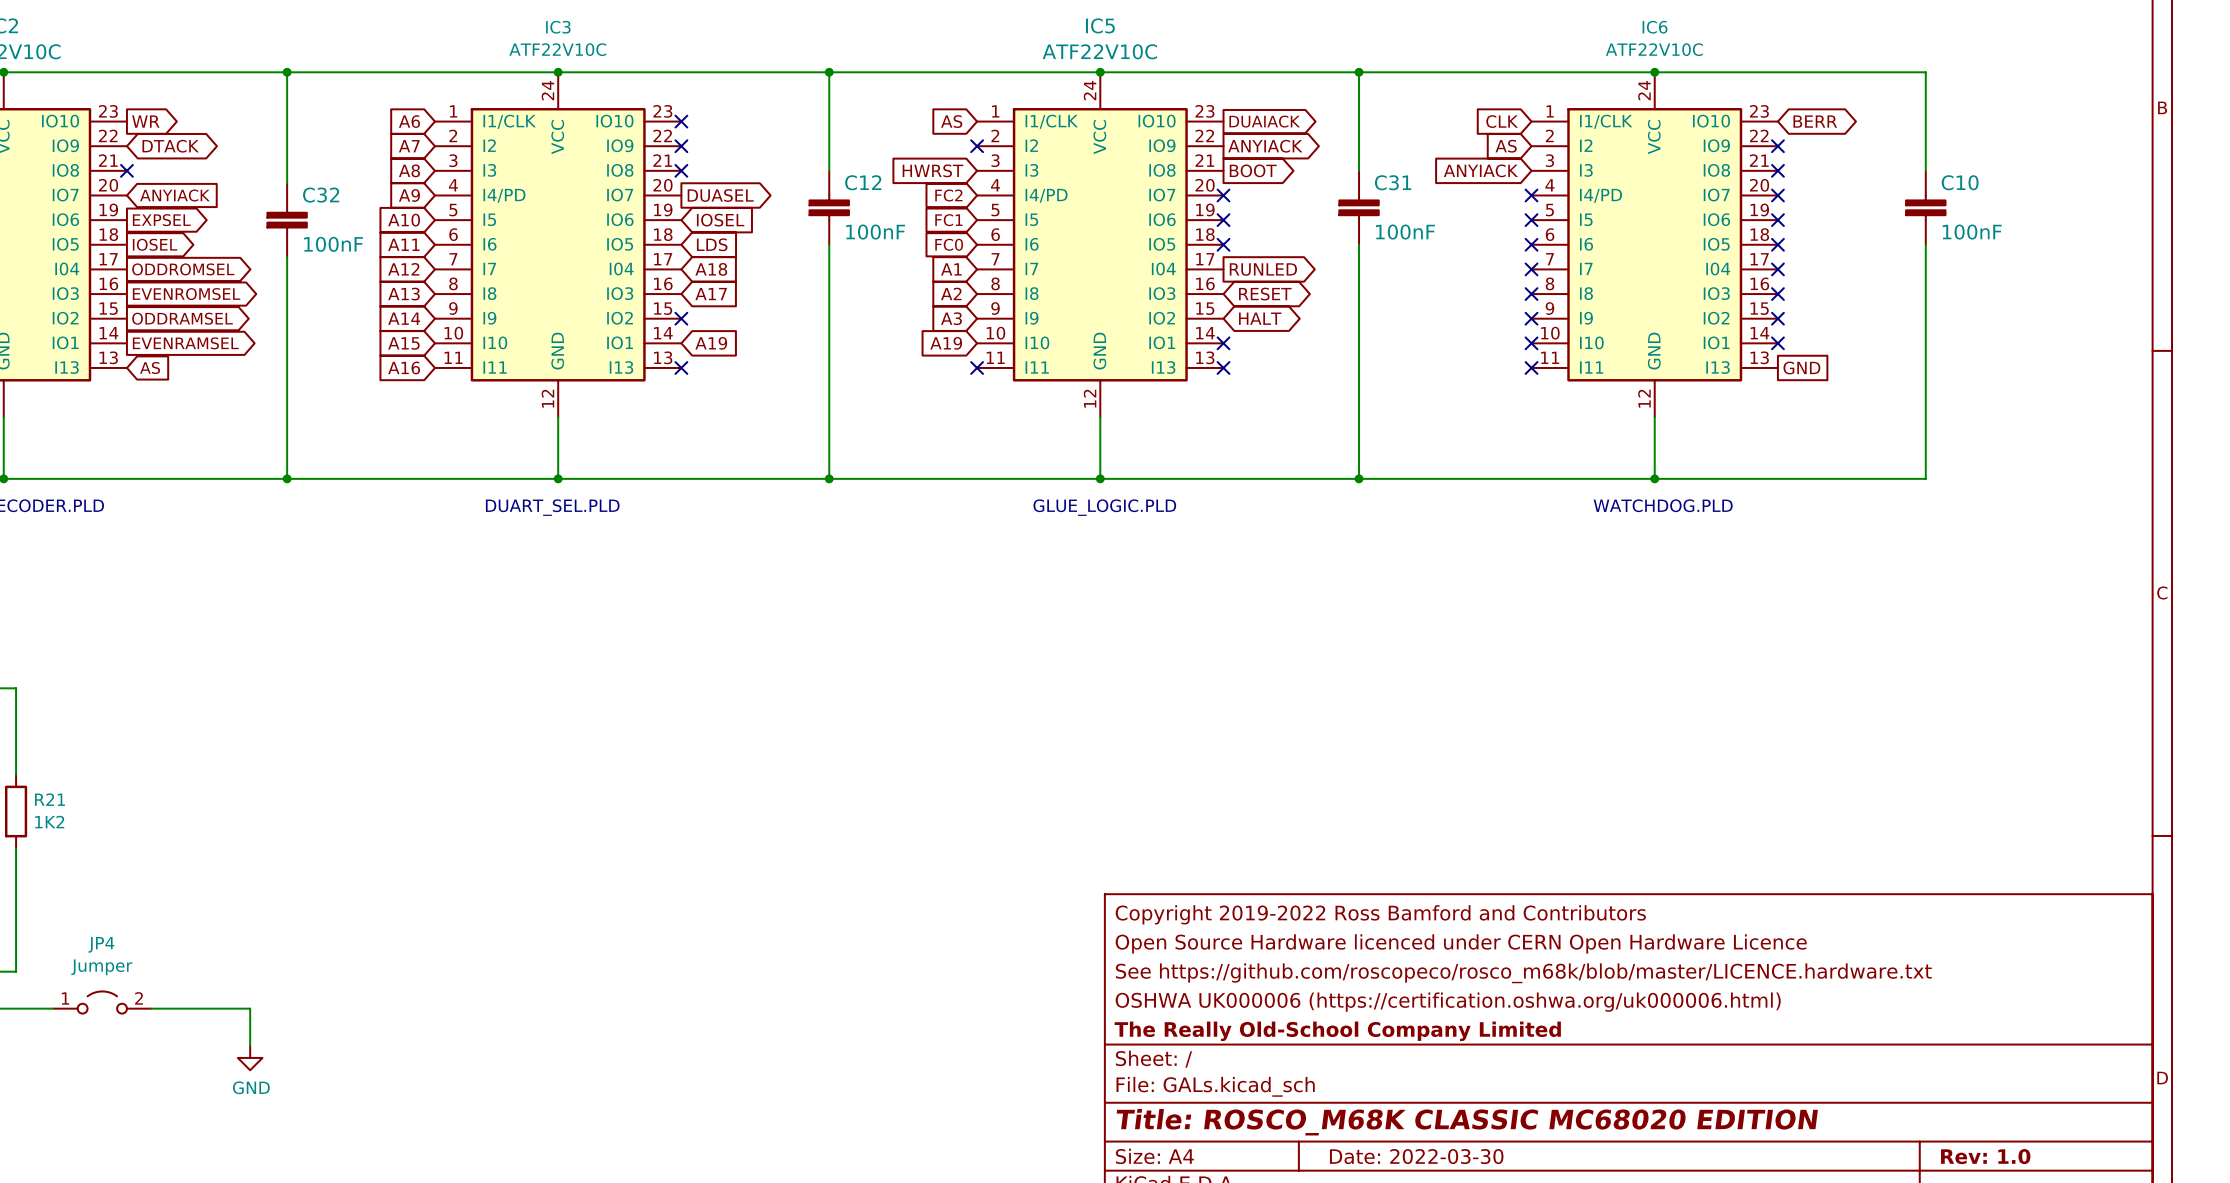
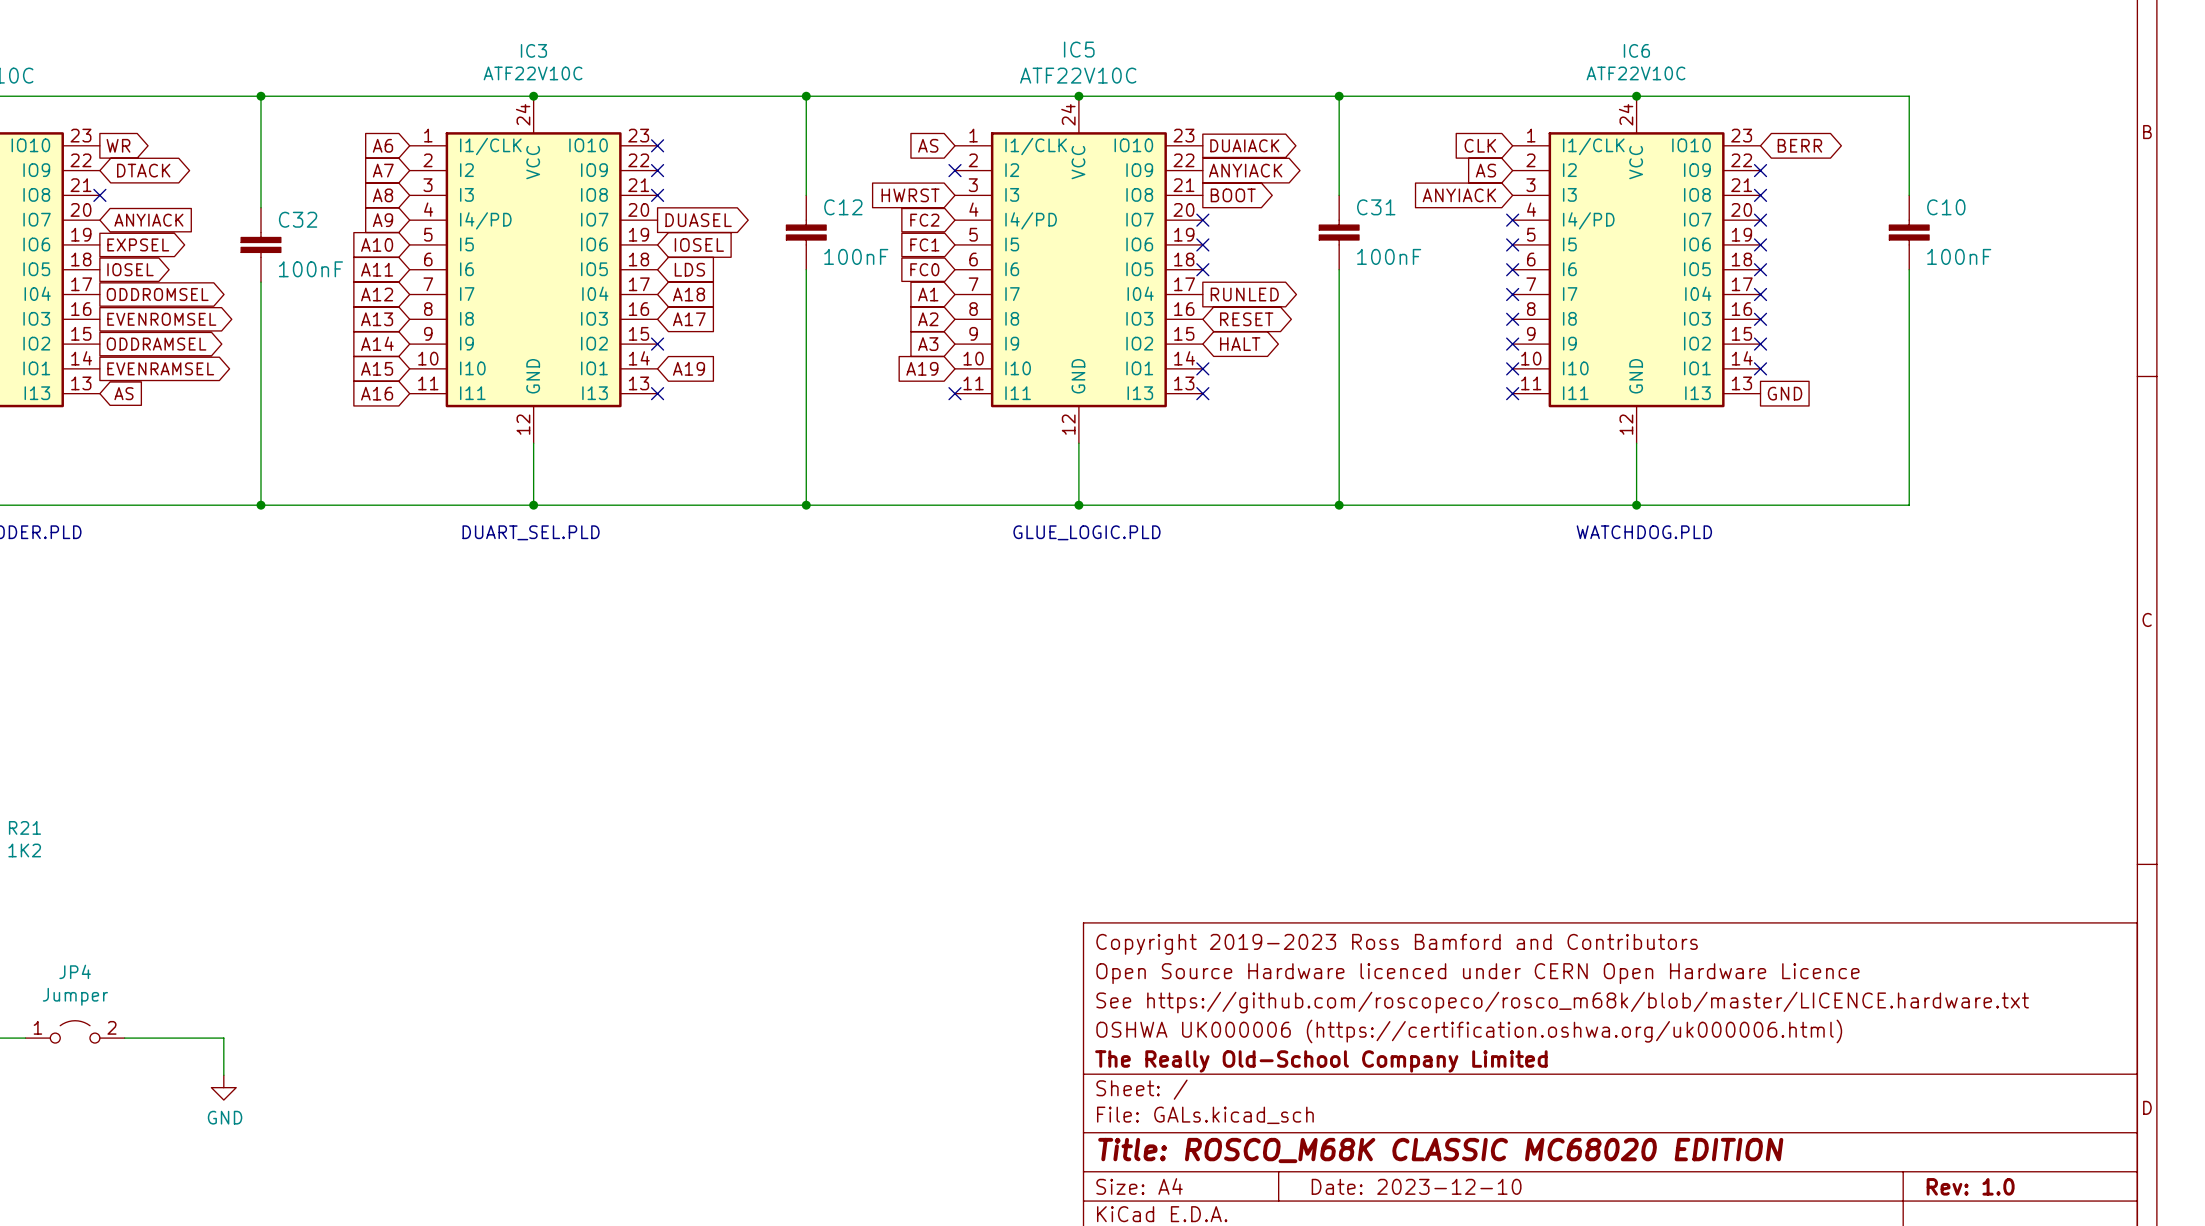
title block: Copyright 2019-2022 Ross Bamford and Contributors (1380, 914) -> Copyright 2019-2023 Ross Bamford and Contributors (1397, 944)
title block: Date: 2022-03-30 (1416, 1156) -> Date: 2023-12-10 (1416, 1186)

